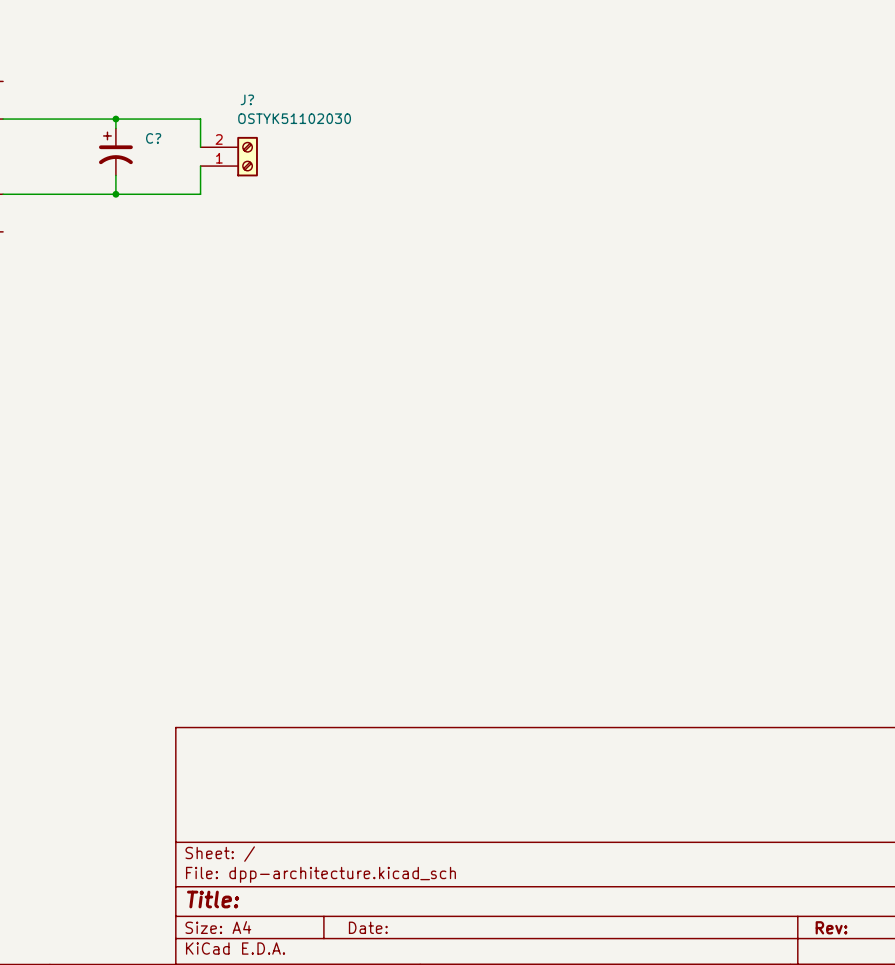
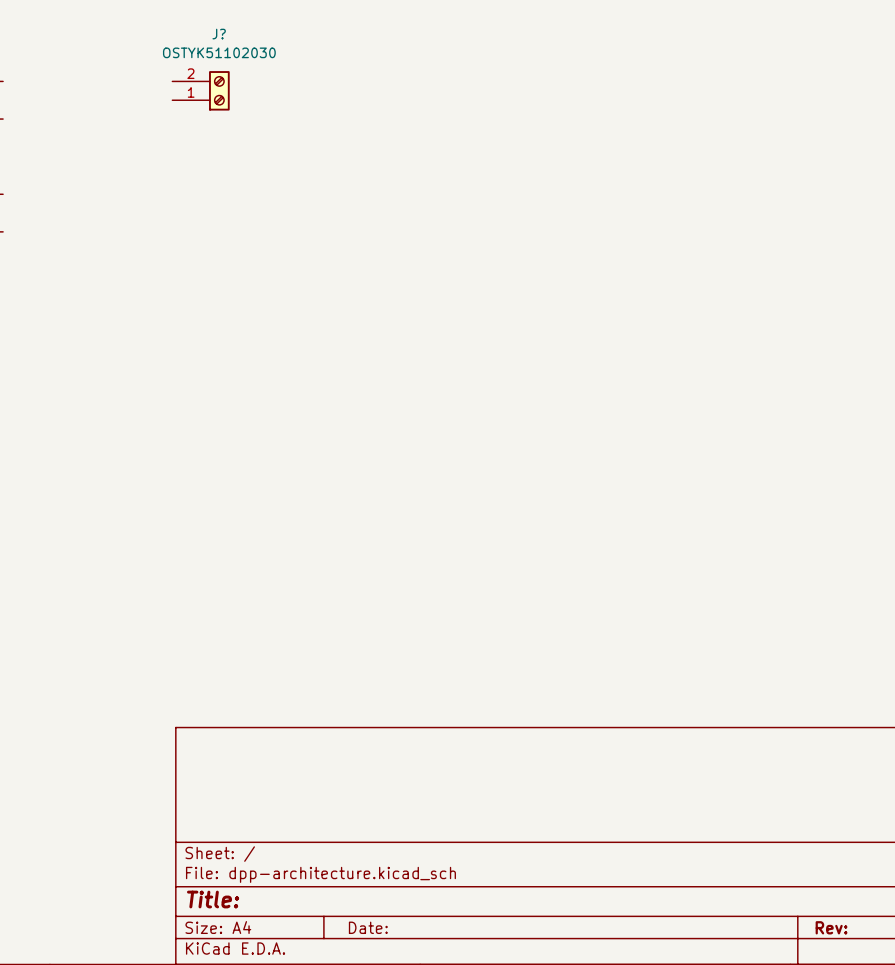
J? value position: OSTYK51102030 (294, 118) -> OSTYK51102030 (219, 52)
wire: (3, 119) (200, 119) (200, 147) -> none
wire: (115, 119) (115, 128) -> none
junction: (115, 119) -> none
C?: (115, 151) -> none
J? position: (229, 156) -> (201, 90)
wire: (200, 166) (200, 194) (3, 194) -> none
wire: (115, 175) (115, 194) -> none
junction: (115, 194) -> none

